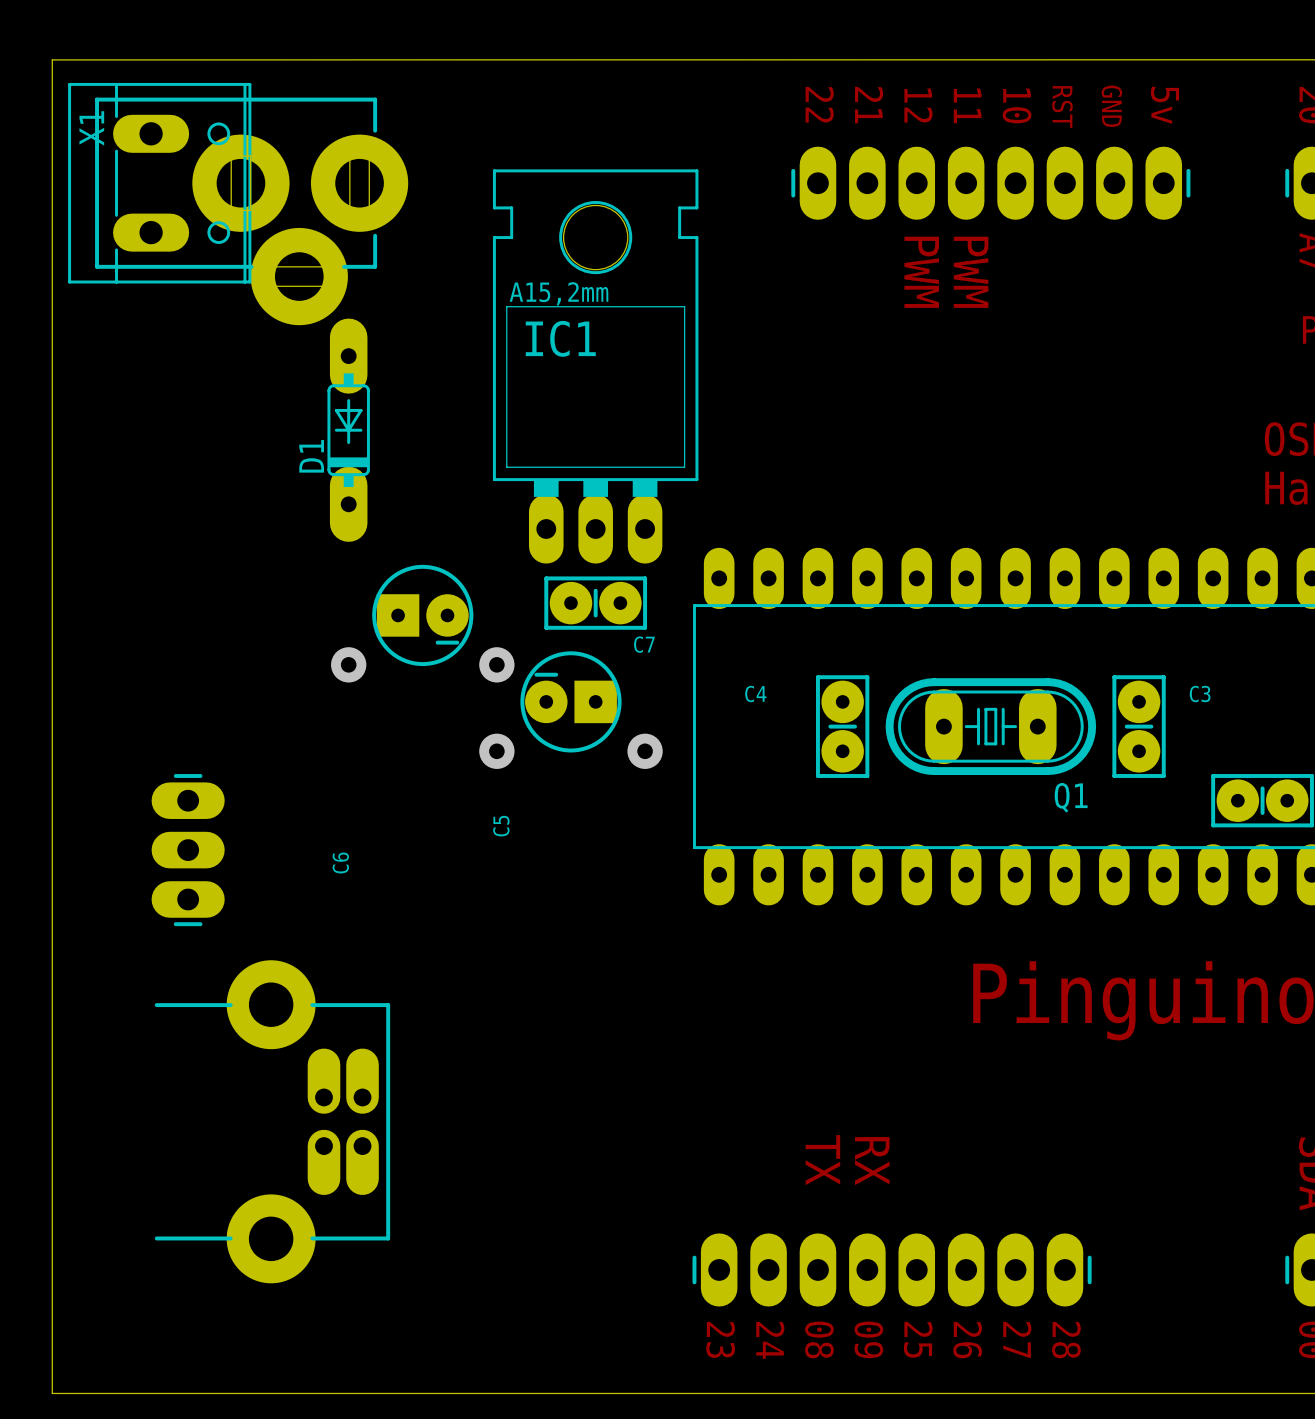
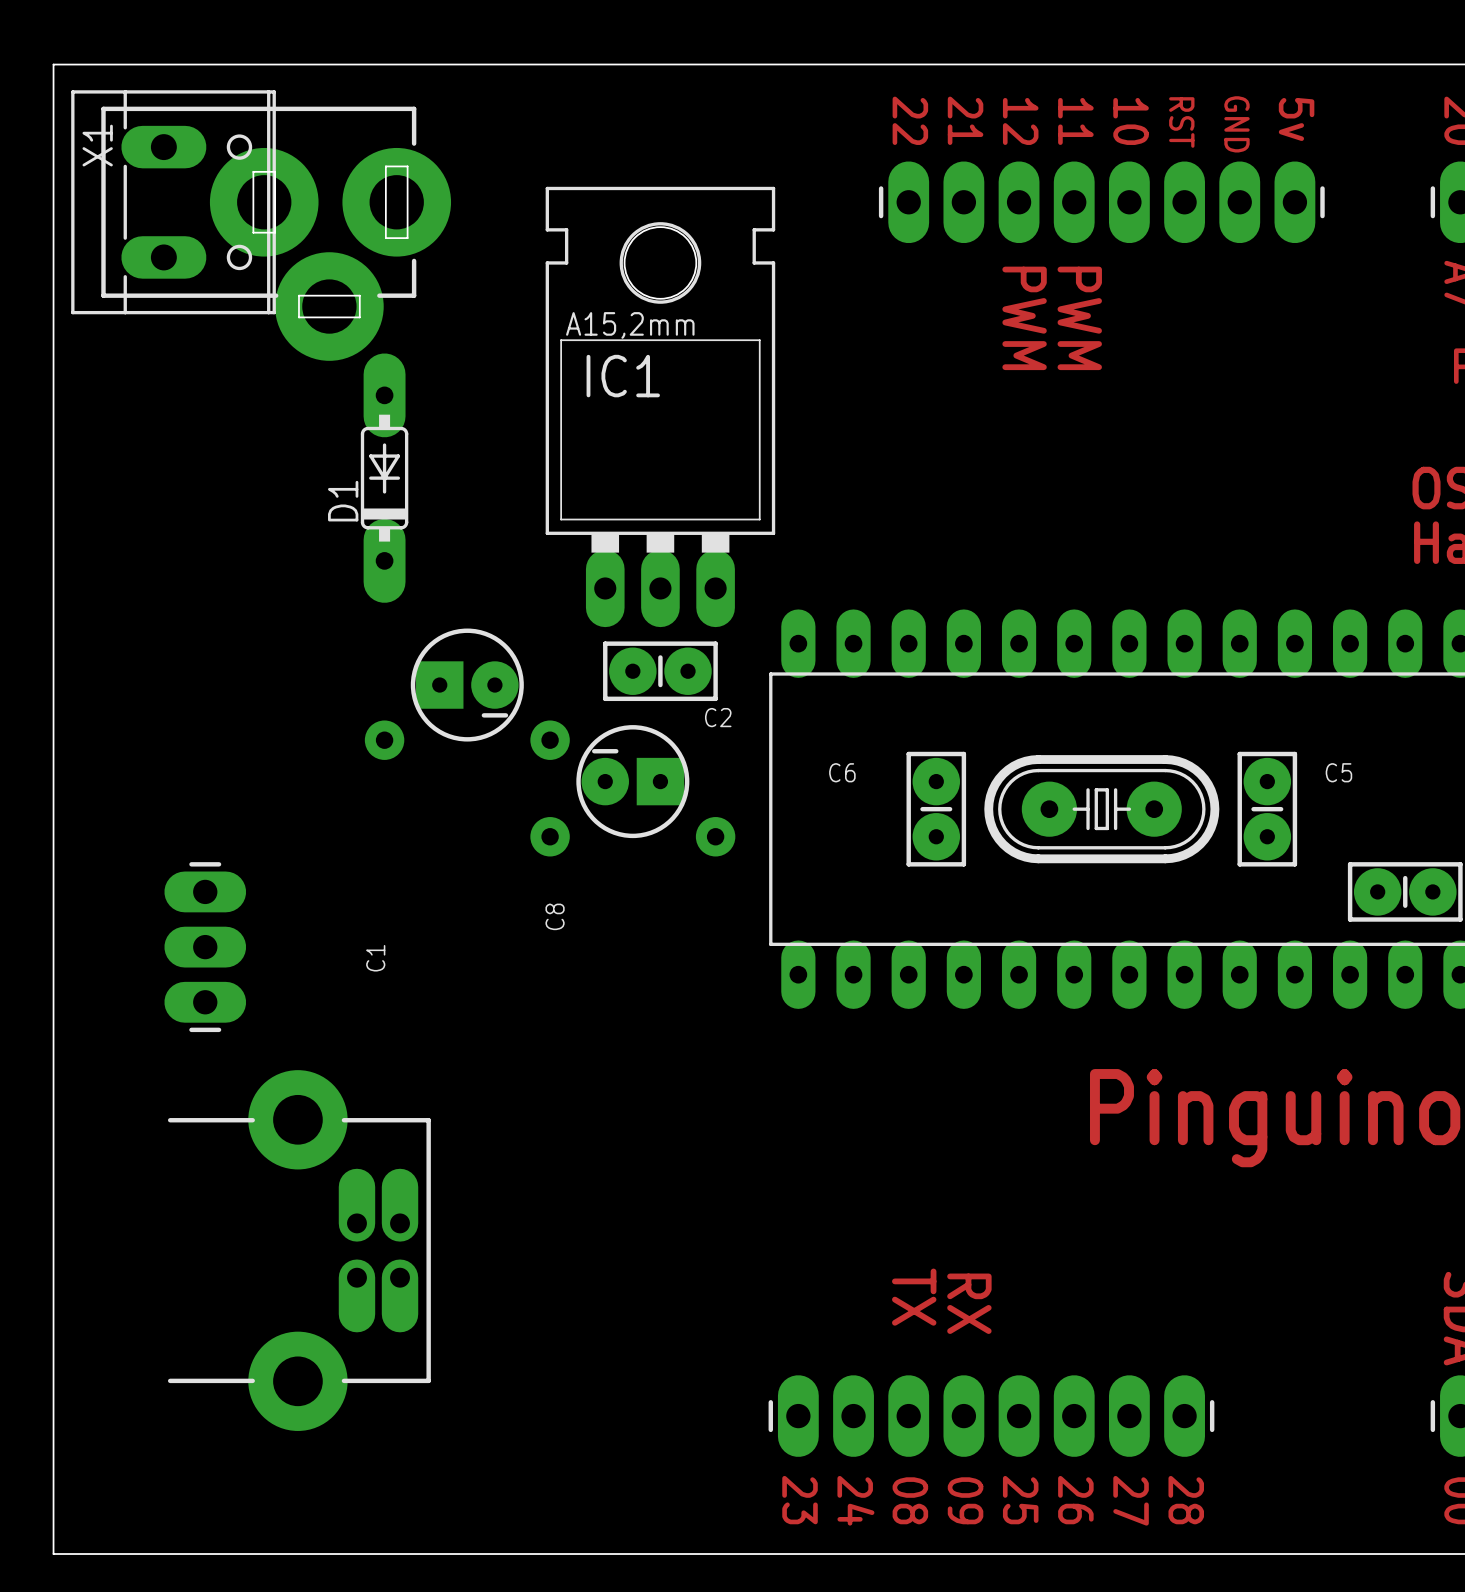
C7 name: C7 (644, 644) -> C2 (718, 717)
C4 name: C4 (755, 694) -> C6 (842, 772)
C3 name: C3 (1200, 694) -> C5 (1338, 772)
Q1: (990, 726) -> none
part: none -> (1101, 809)
C5 name: C5 (501, 826) -> C8 (555, 916)
C6 name: C6 (340, 863) -> C1 (375, 958)

